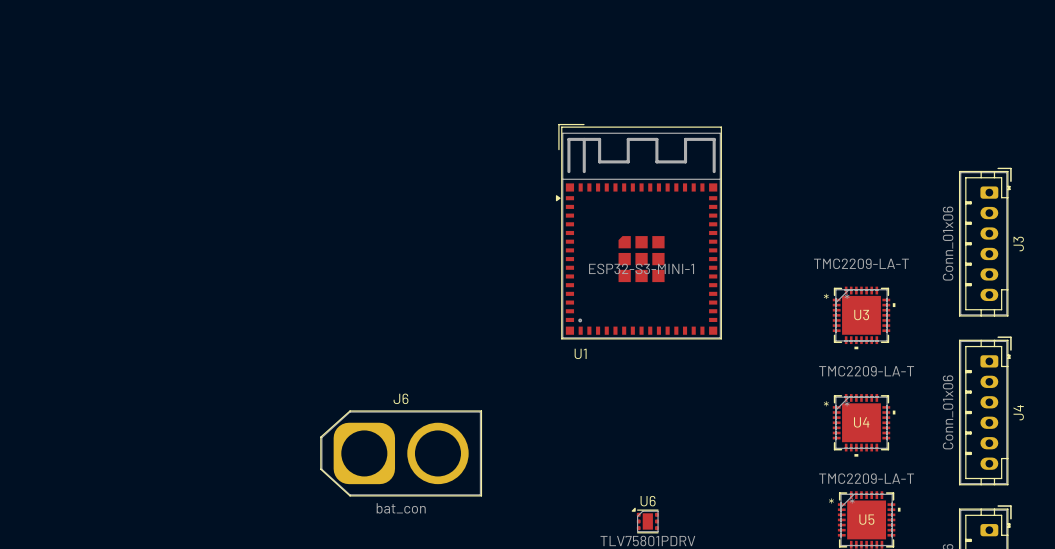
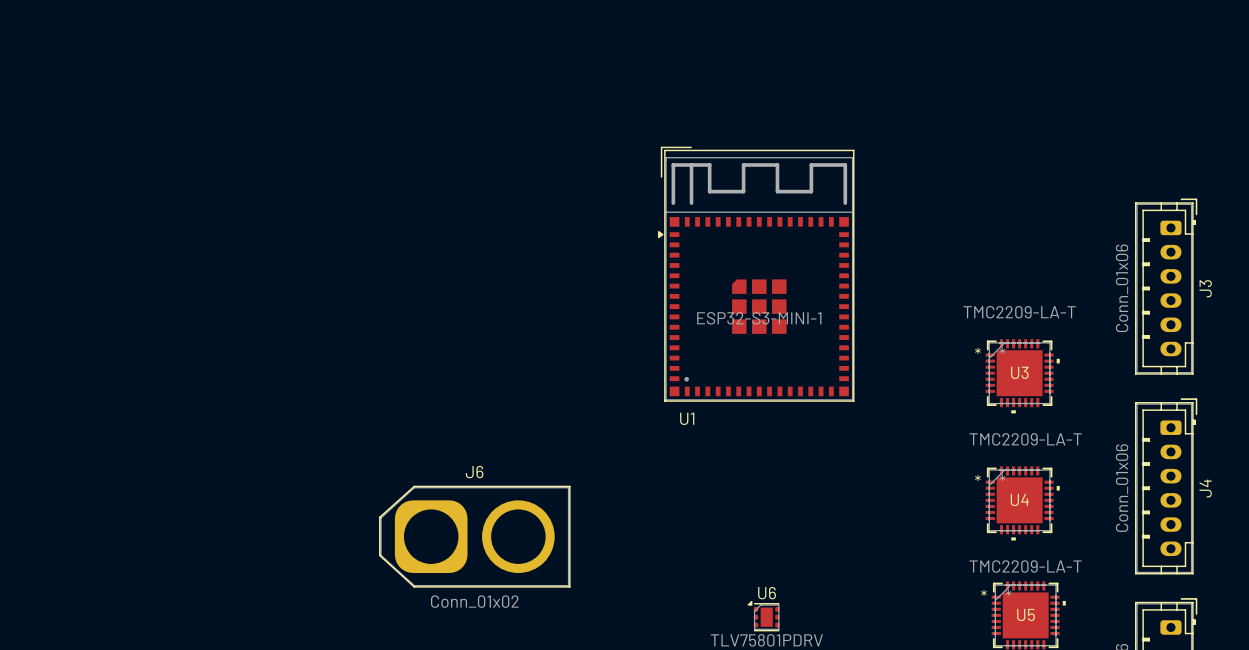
J6 value: bat_con (401, 508) -> Conn_01x02 (474, 601)

